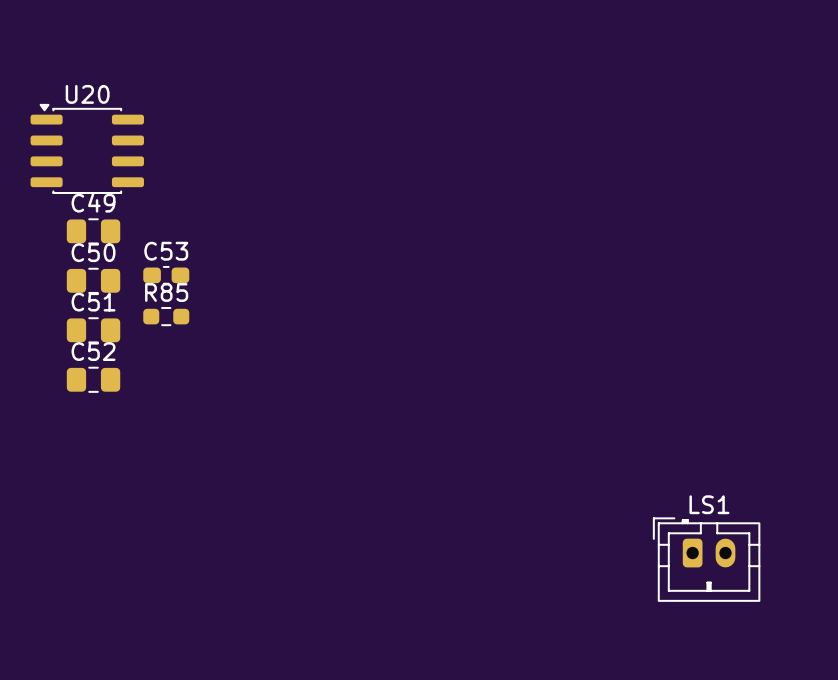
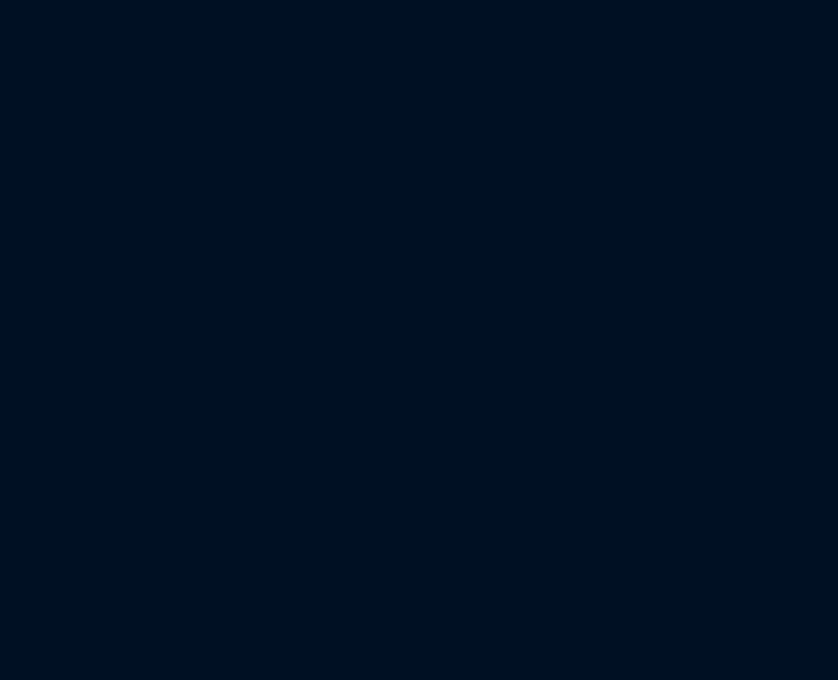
U20: (87, 148) -> none
C49: (93, 231) -> none
C53: (166, 275) -> none
C50: (93, 280) -> none
R85: (166, 316) -> none
C51: (93, 330) -> none
C52: (93, 379) -> none
LS1: (706, 559) -> none

